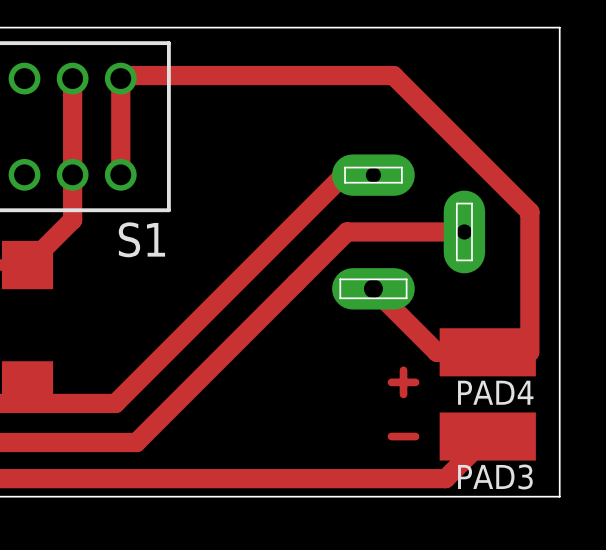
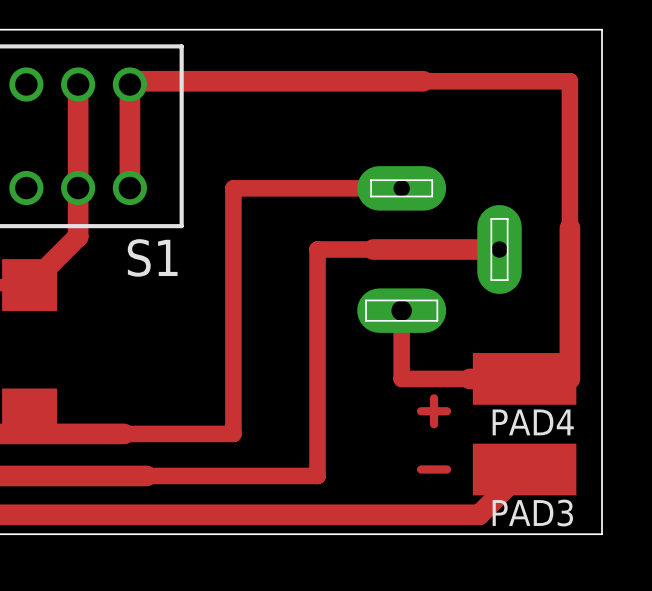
track: (393, 75) (529, 211) -> (423, 81) (569, 81) (569, 227)
track: (343, 175) (115, 403) -> (369, 188) (233, 188) (233, 433) (124, 433)
track: (346, 231) (136, 442) -> (373, 249) (317, 249) (317, 475) (146, 475)
track: (373, 288) (436, 352) -> (401, 310) (401, 378) (469, 378)

